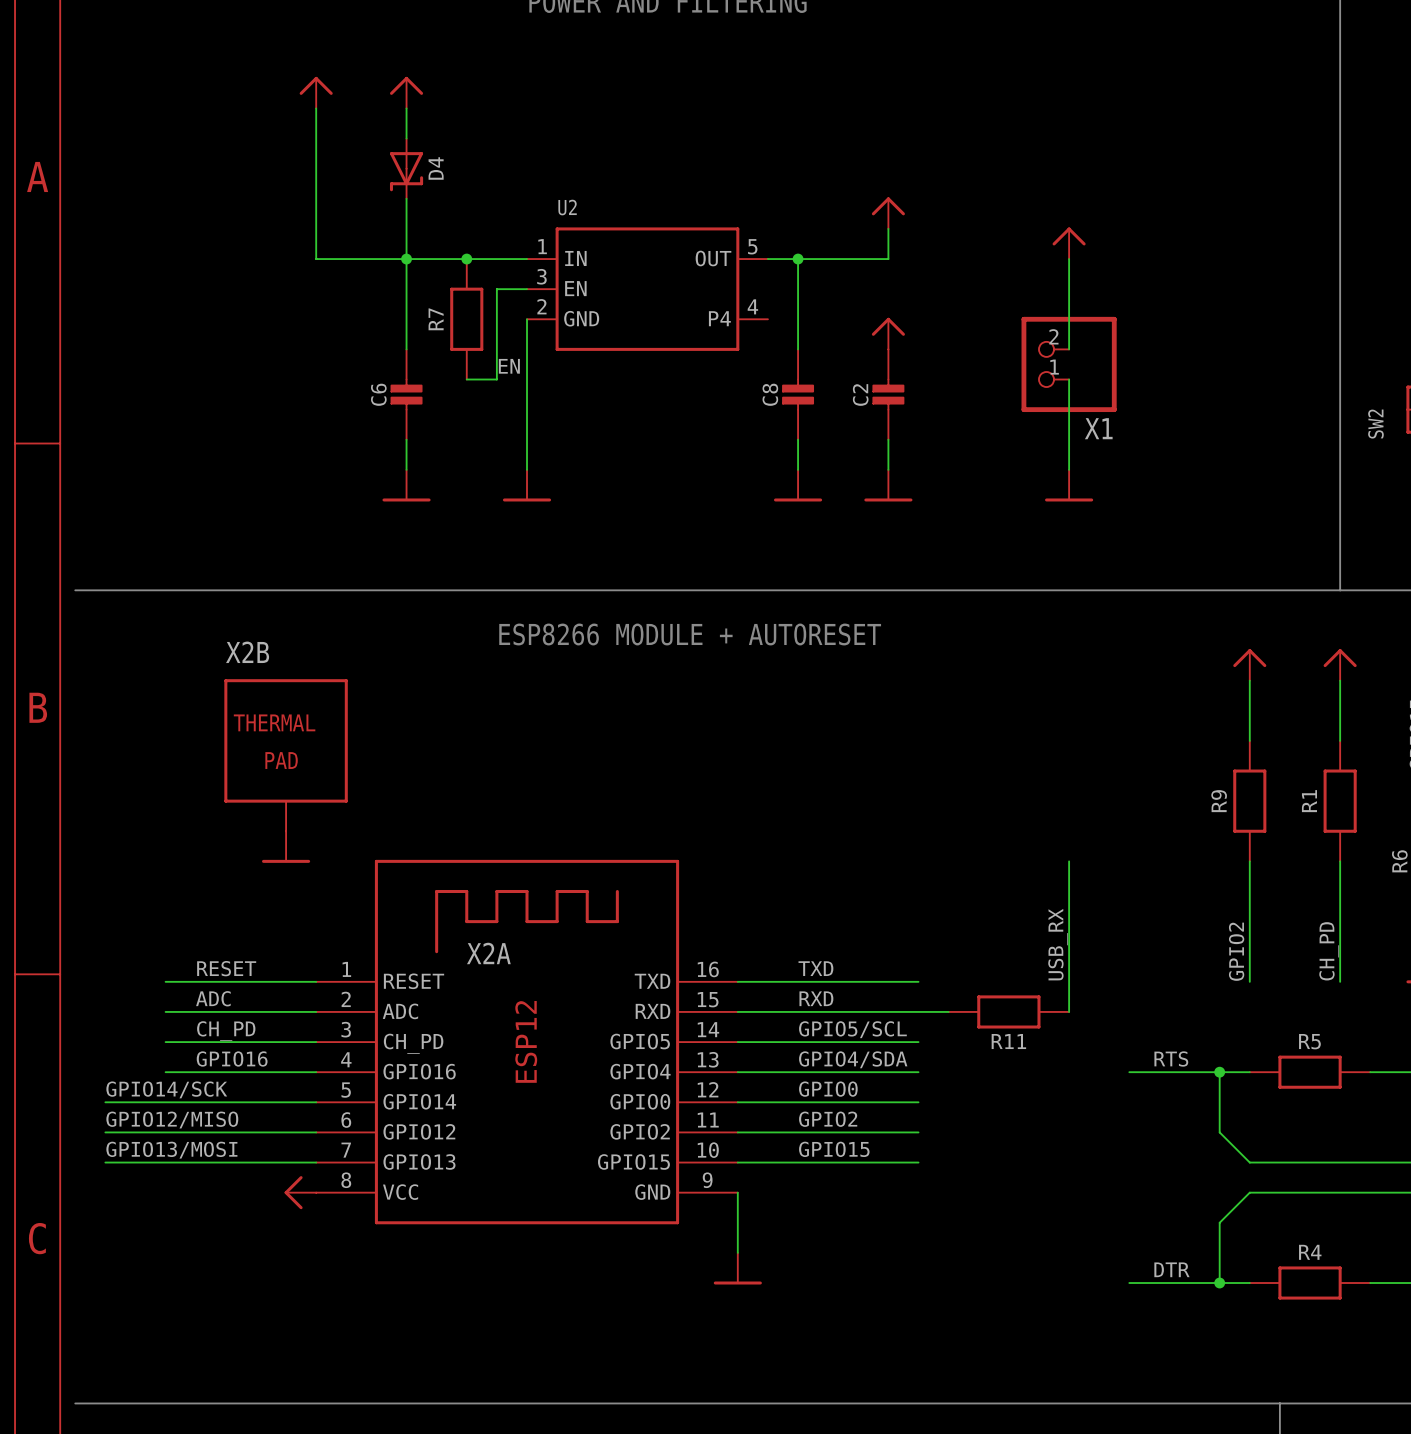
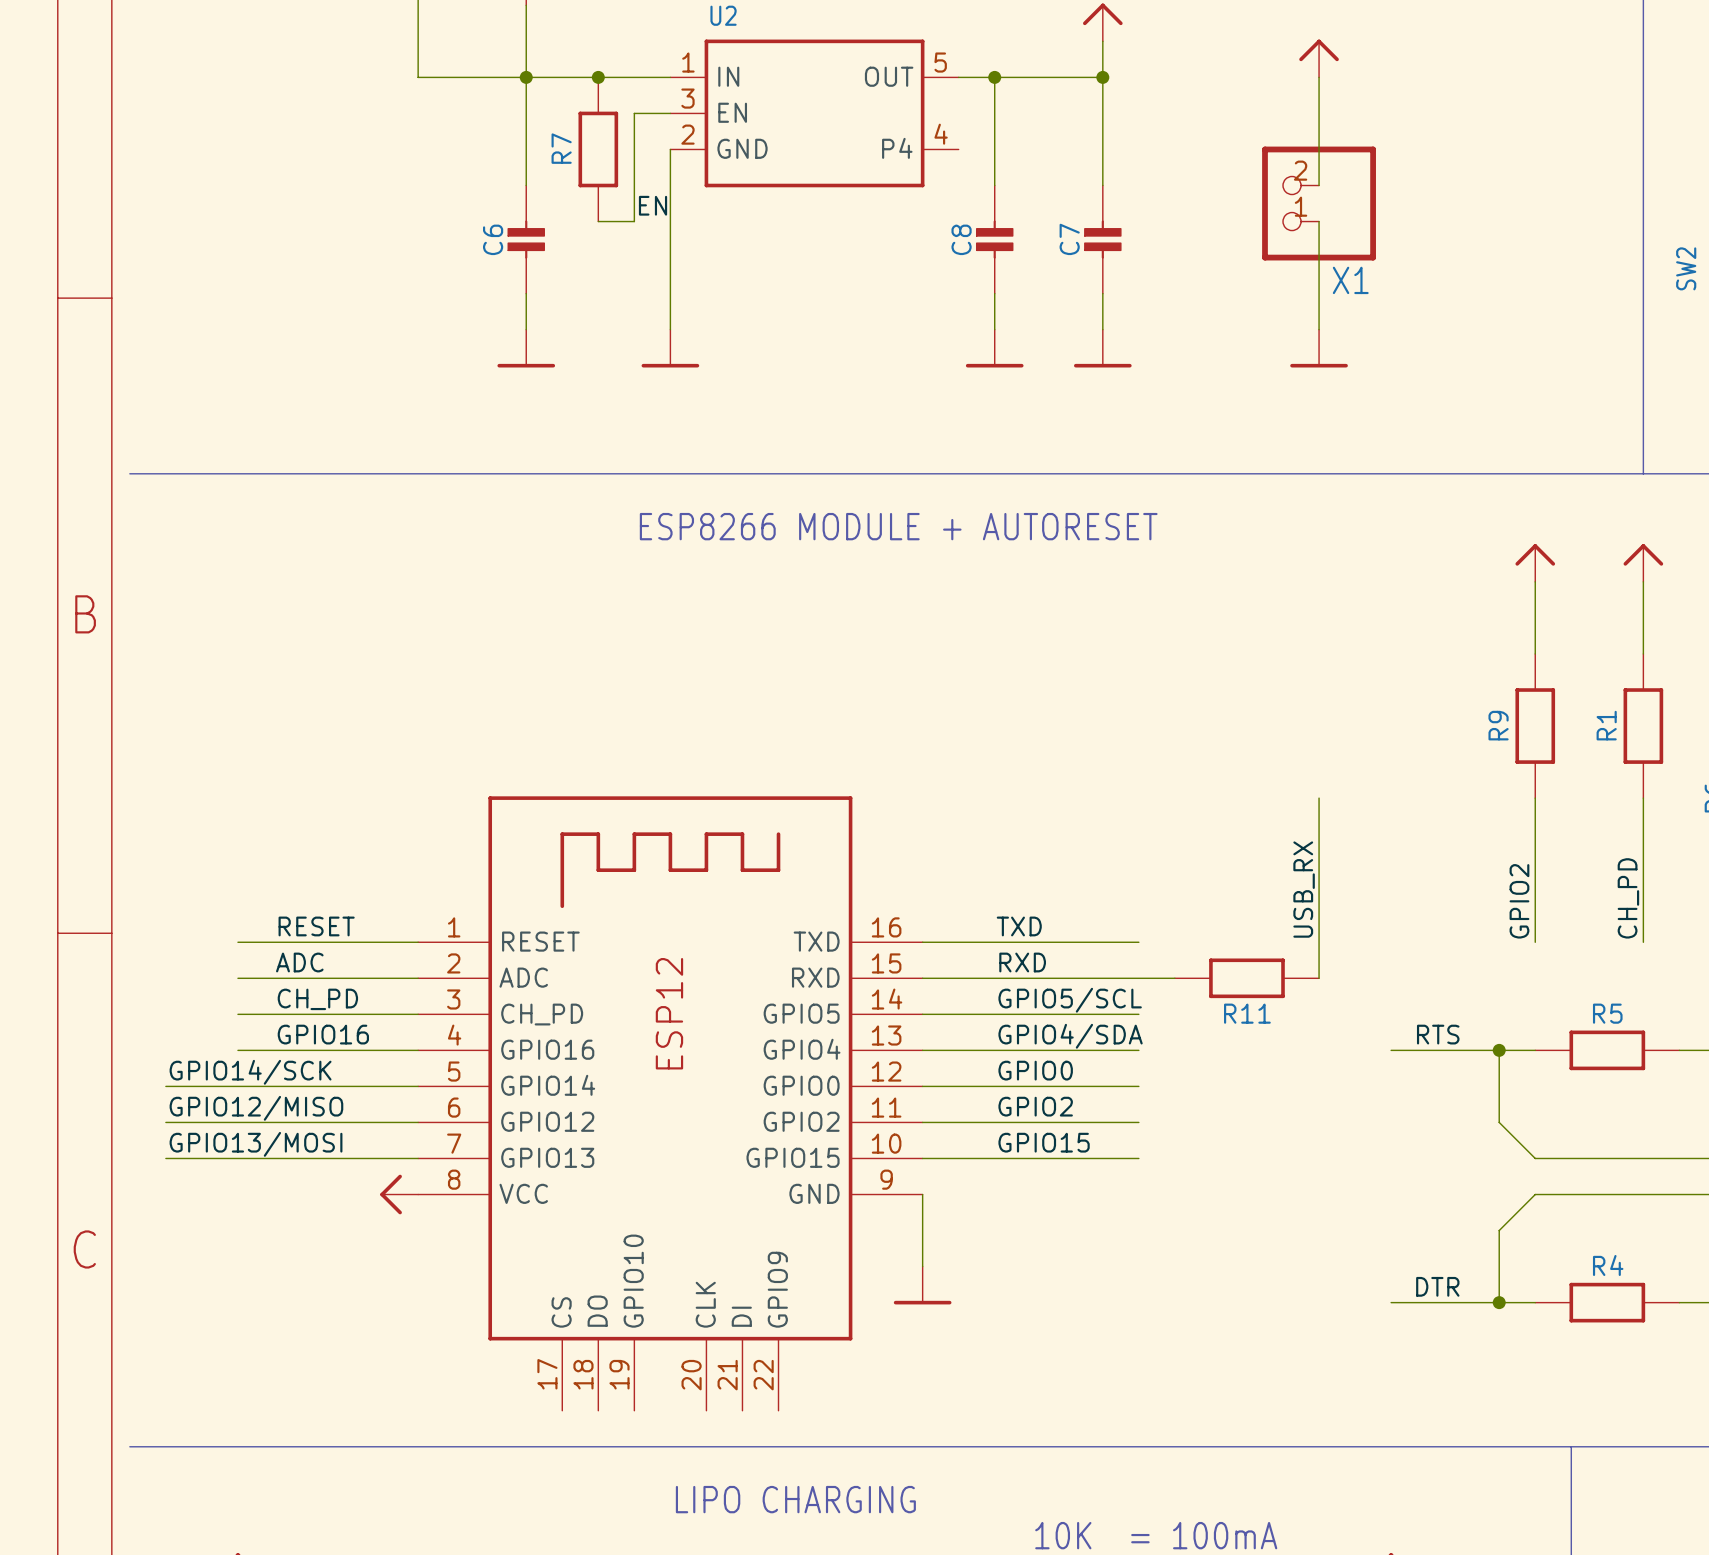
wire: none -> (1102, 77) (1102, 185)
junction: none -> (1102, 77)
power symbol: (888, 333) -> none
C2 name: C2 (860, 394) -> C7 (1069, 239)
X2B: (286, 755) -> none
power symbol: (286, 847) -> none
X2A: (527, 1042) -> none
part: none -> (670, 1103)

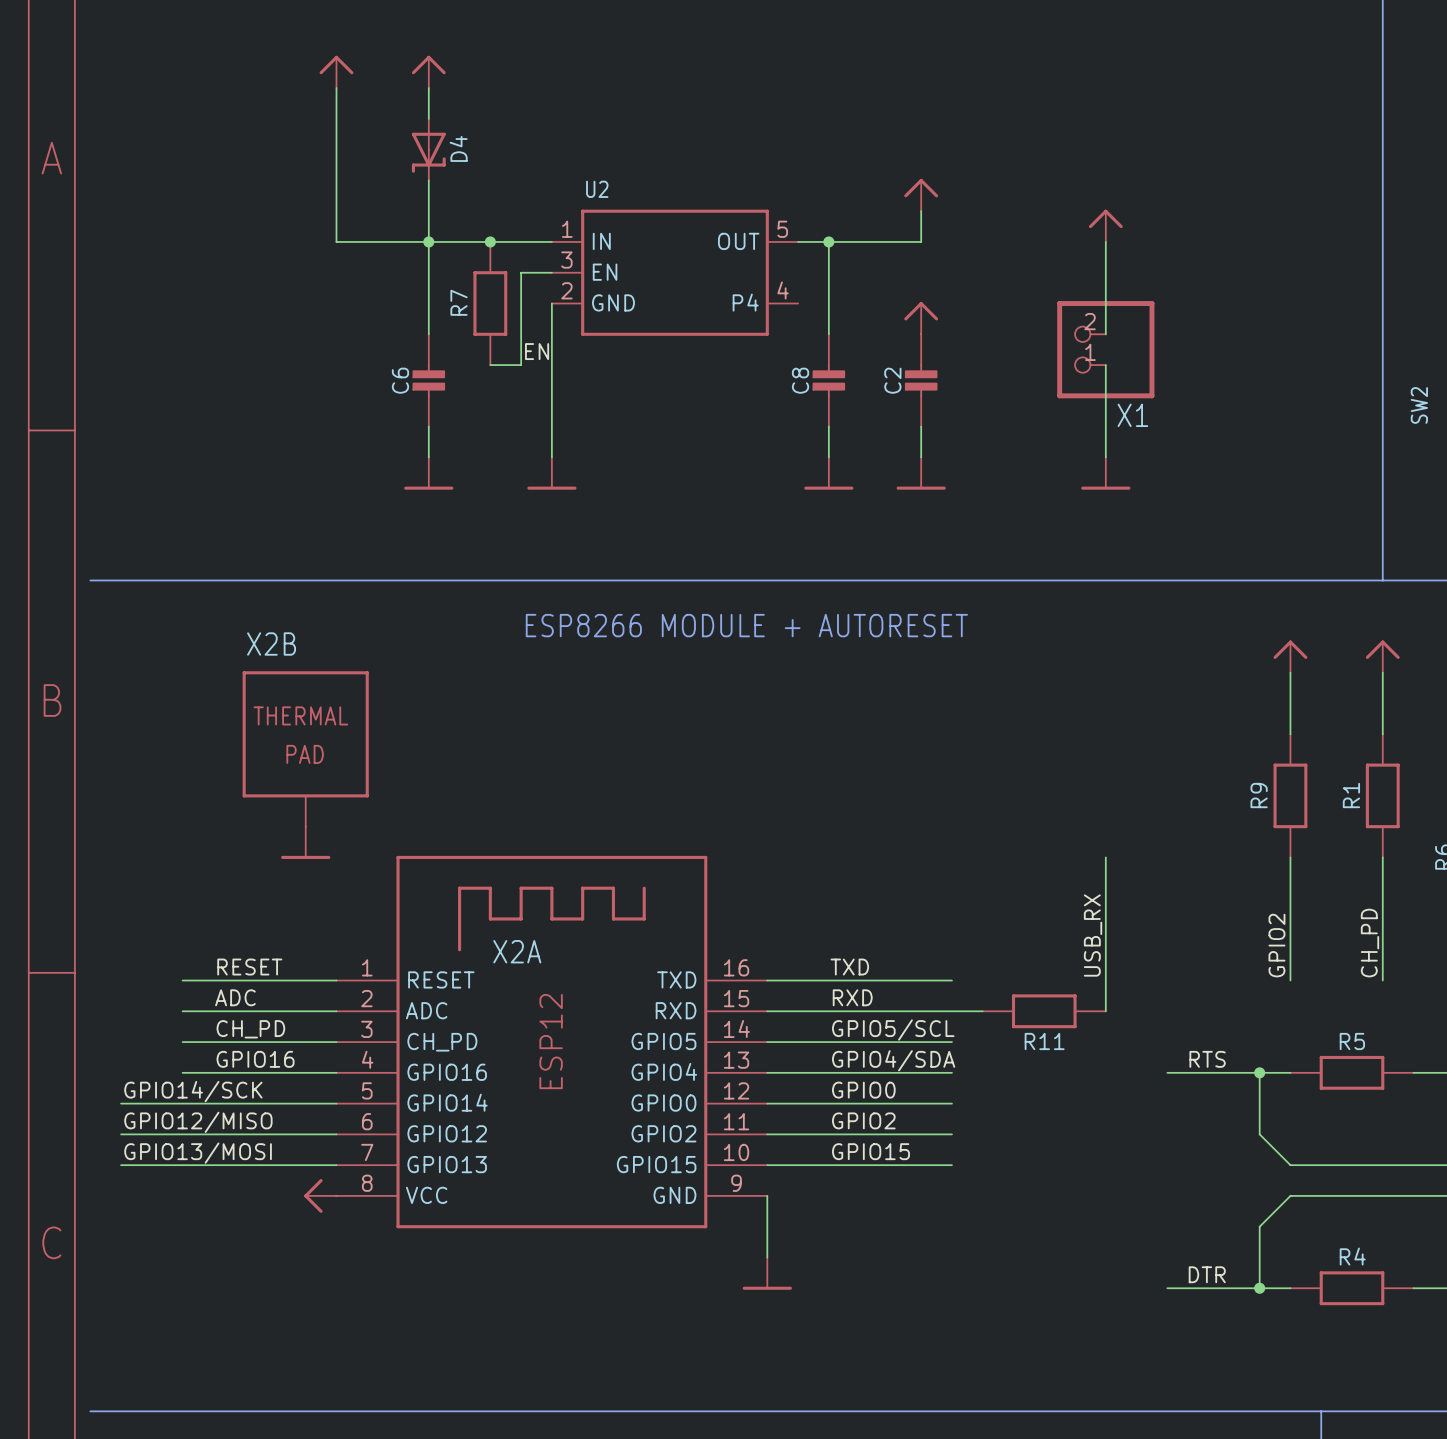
wire: (1102, 77) (1102, 185) -> none
junction: (1102, 77) -> none
power symbol: none -> (921, 318)
C7 name: C7 (1069, 239) -> C2 (892, 380)
X2B: none -> (305, 748)
power symbol: none -> (305, 842)
X2A: none -> (551, 1042)
part: (670, 1103) -> none

